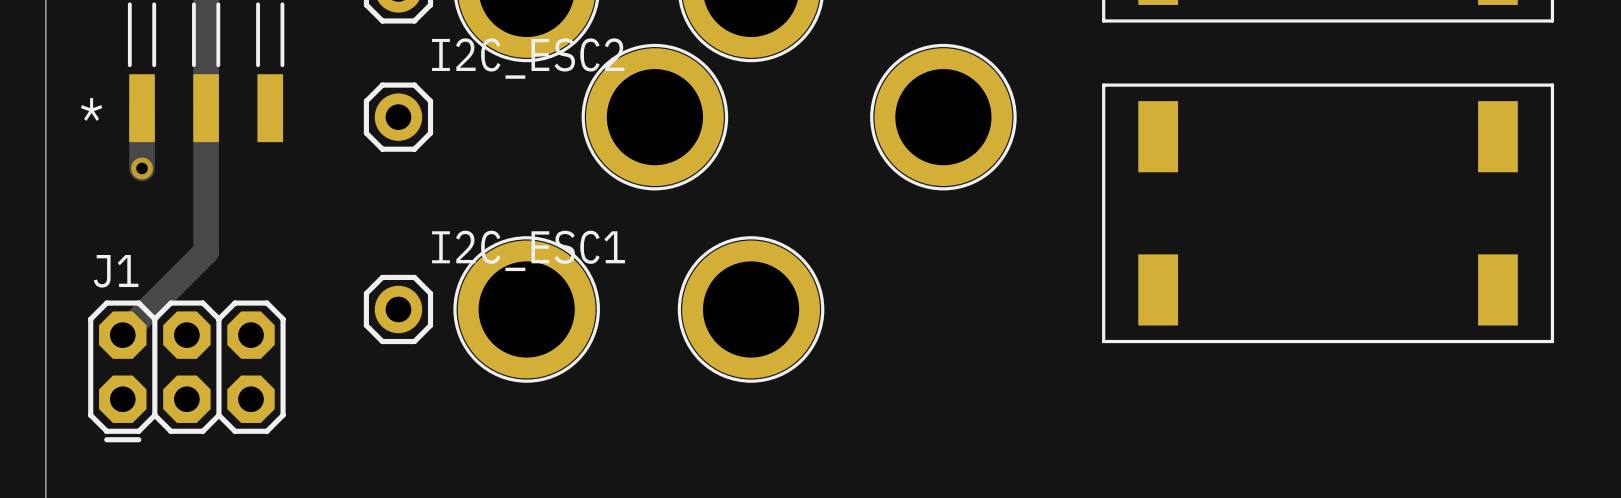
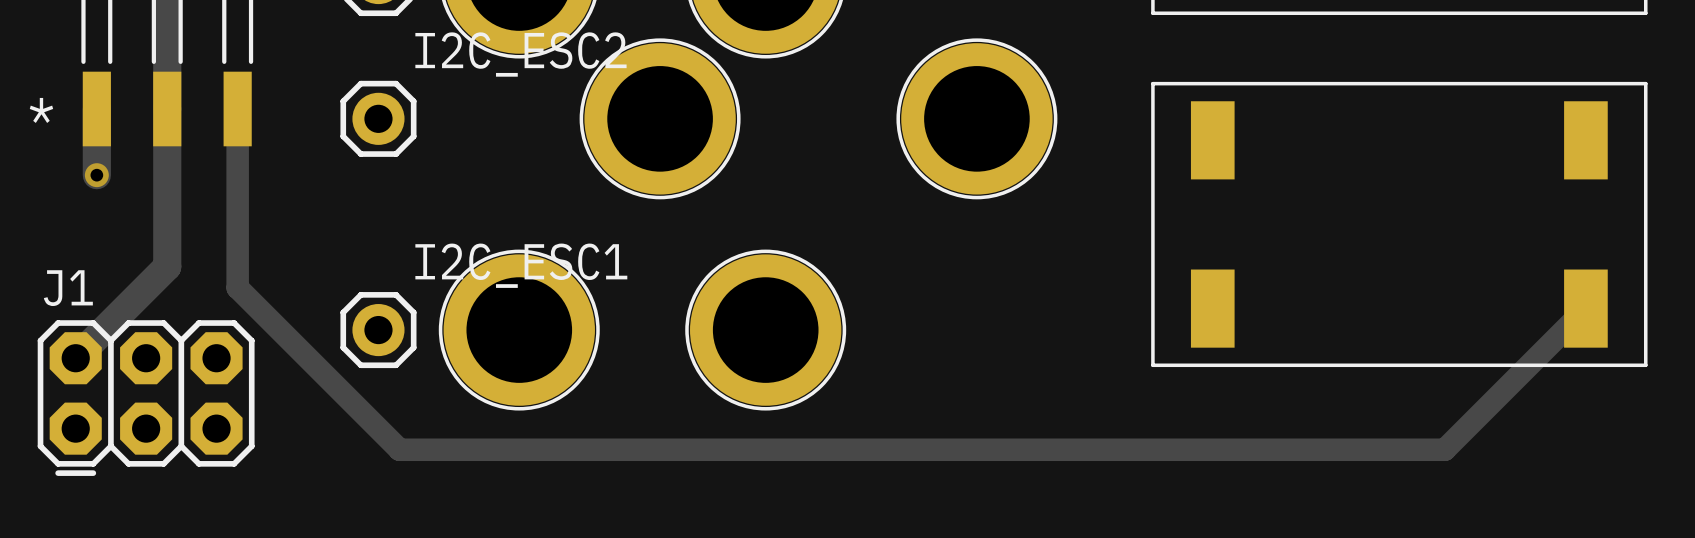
track: none -> (237, 108) (237, 287) (399, 449) (1444, 449) (1585, 308)

